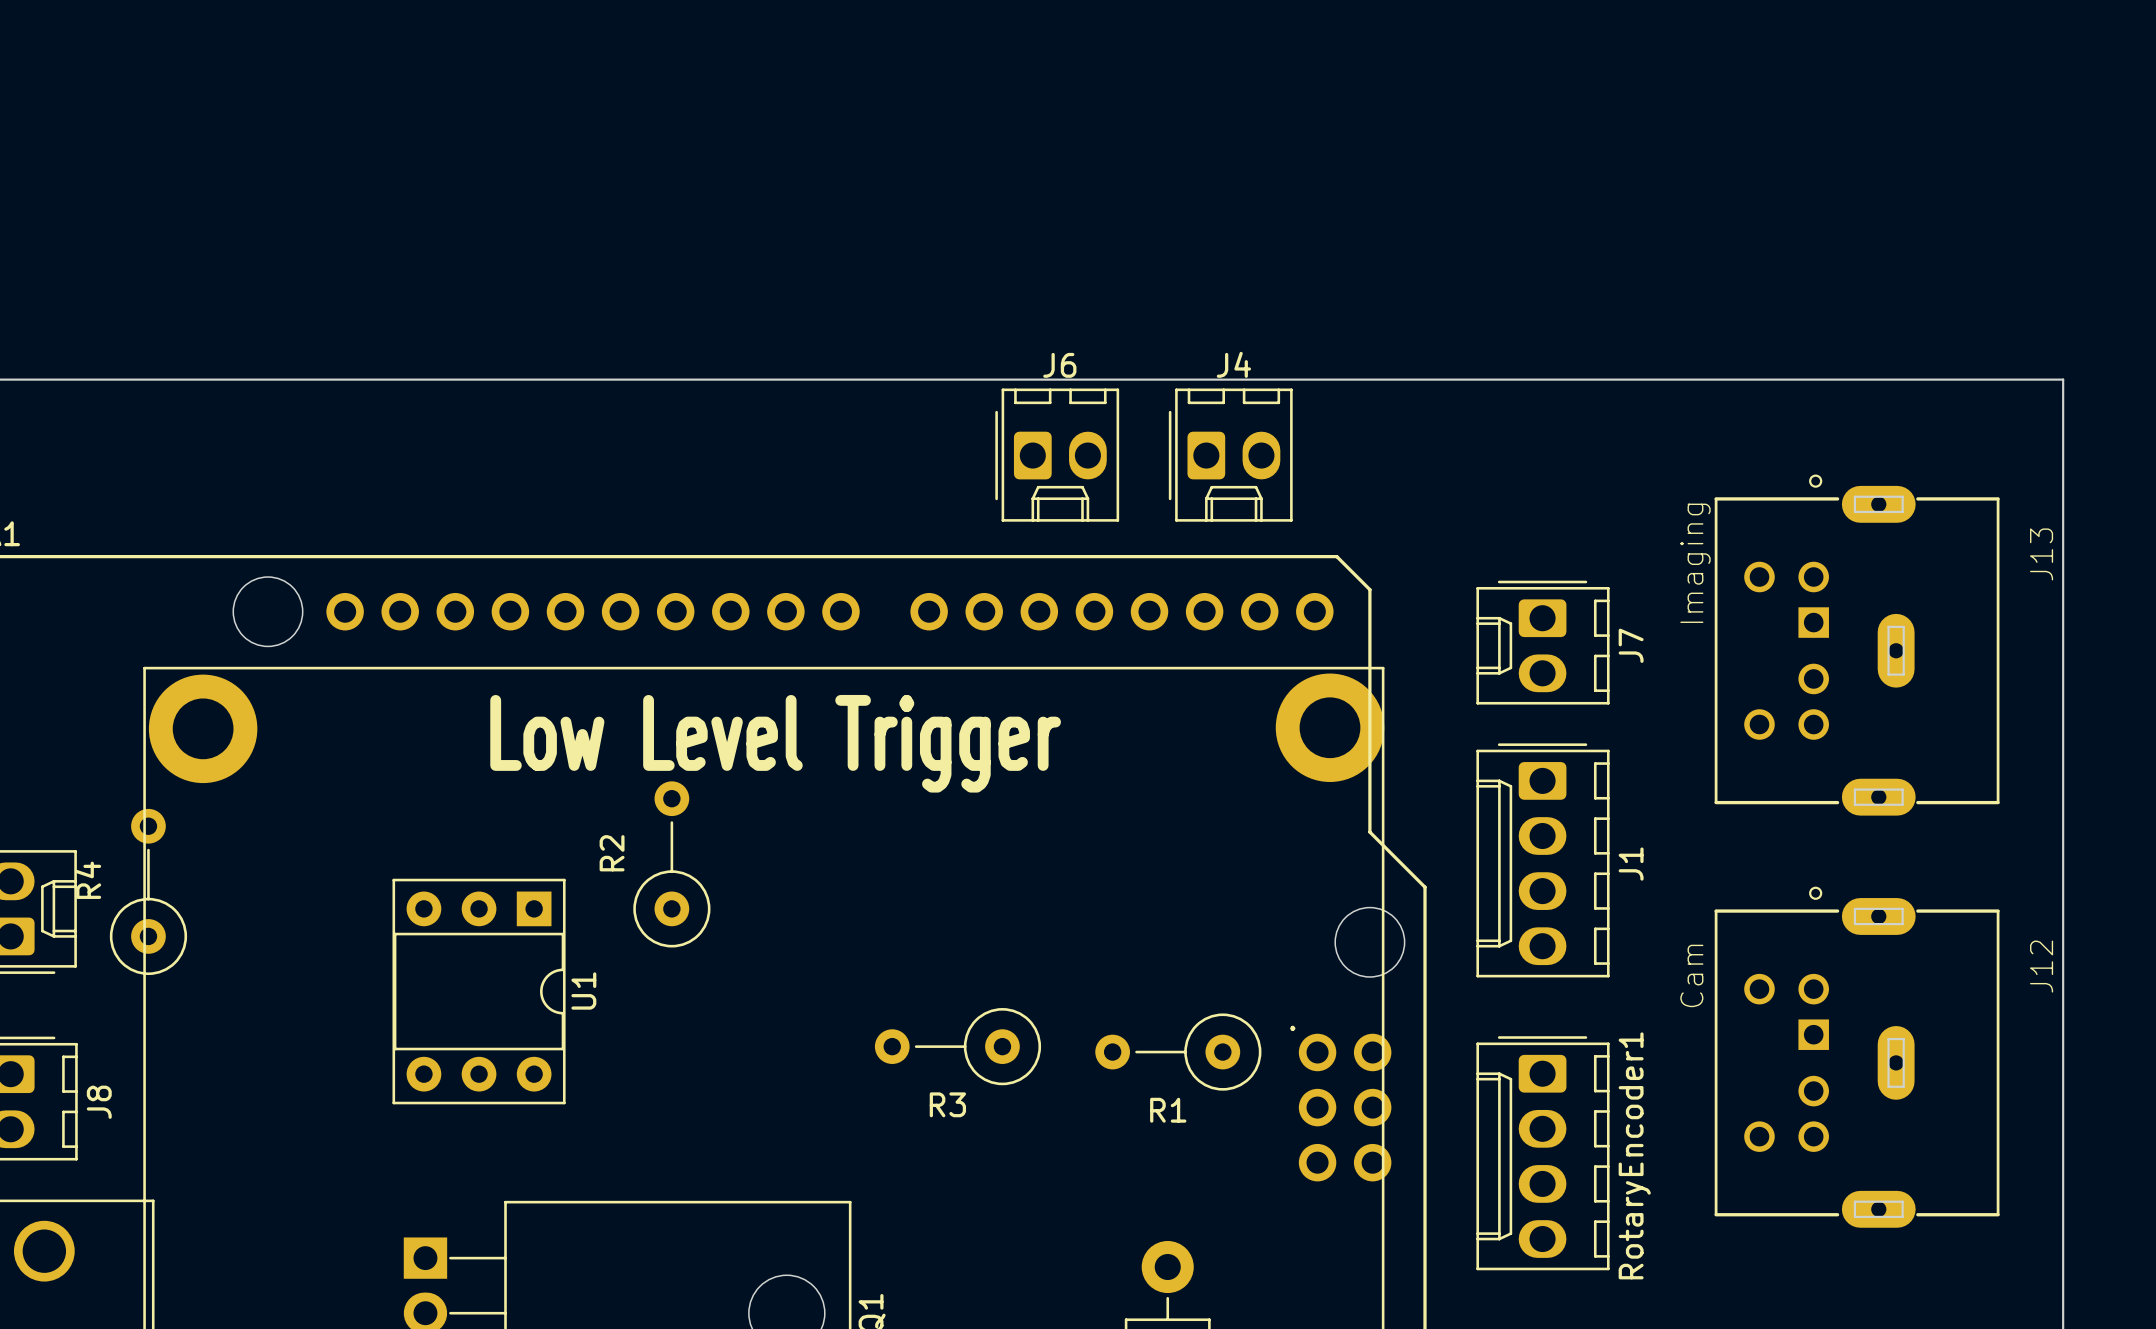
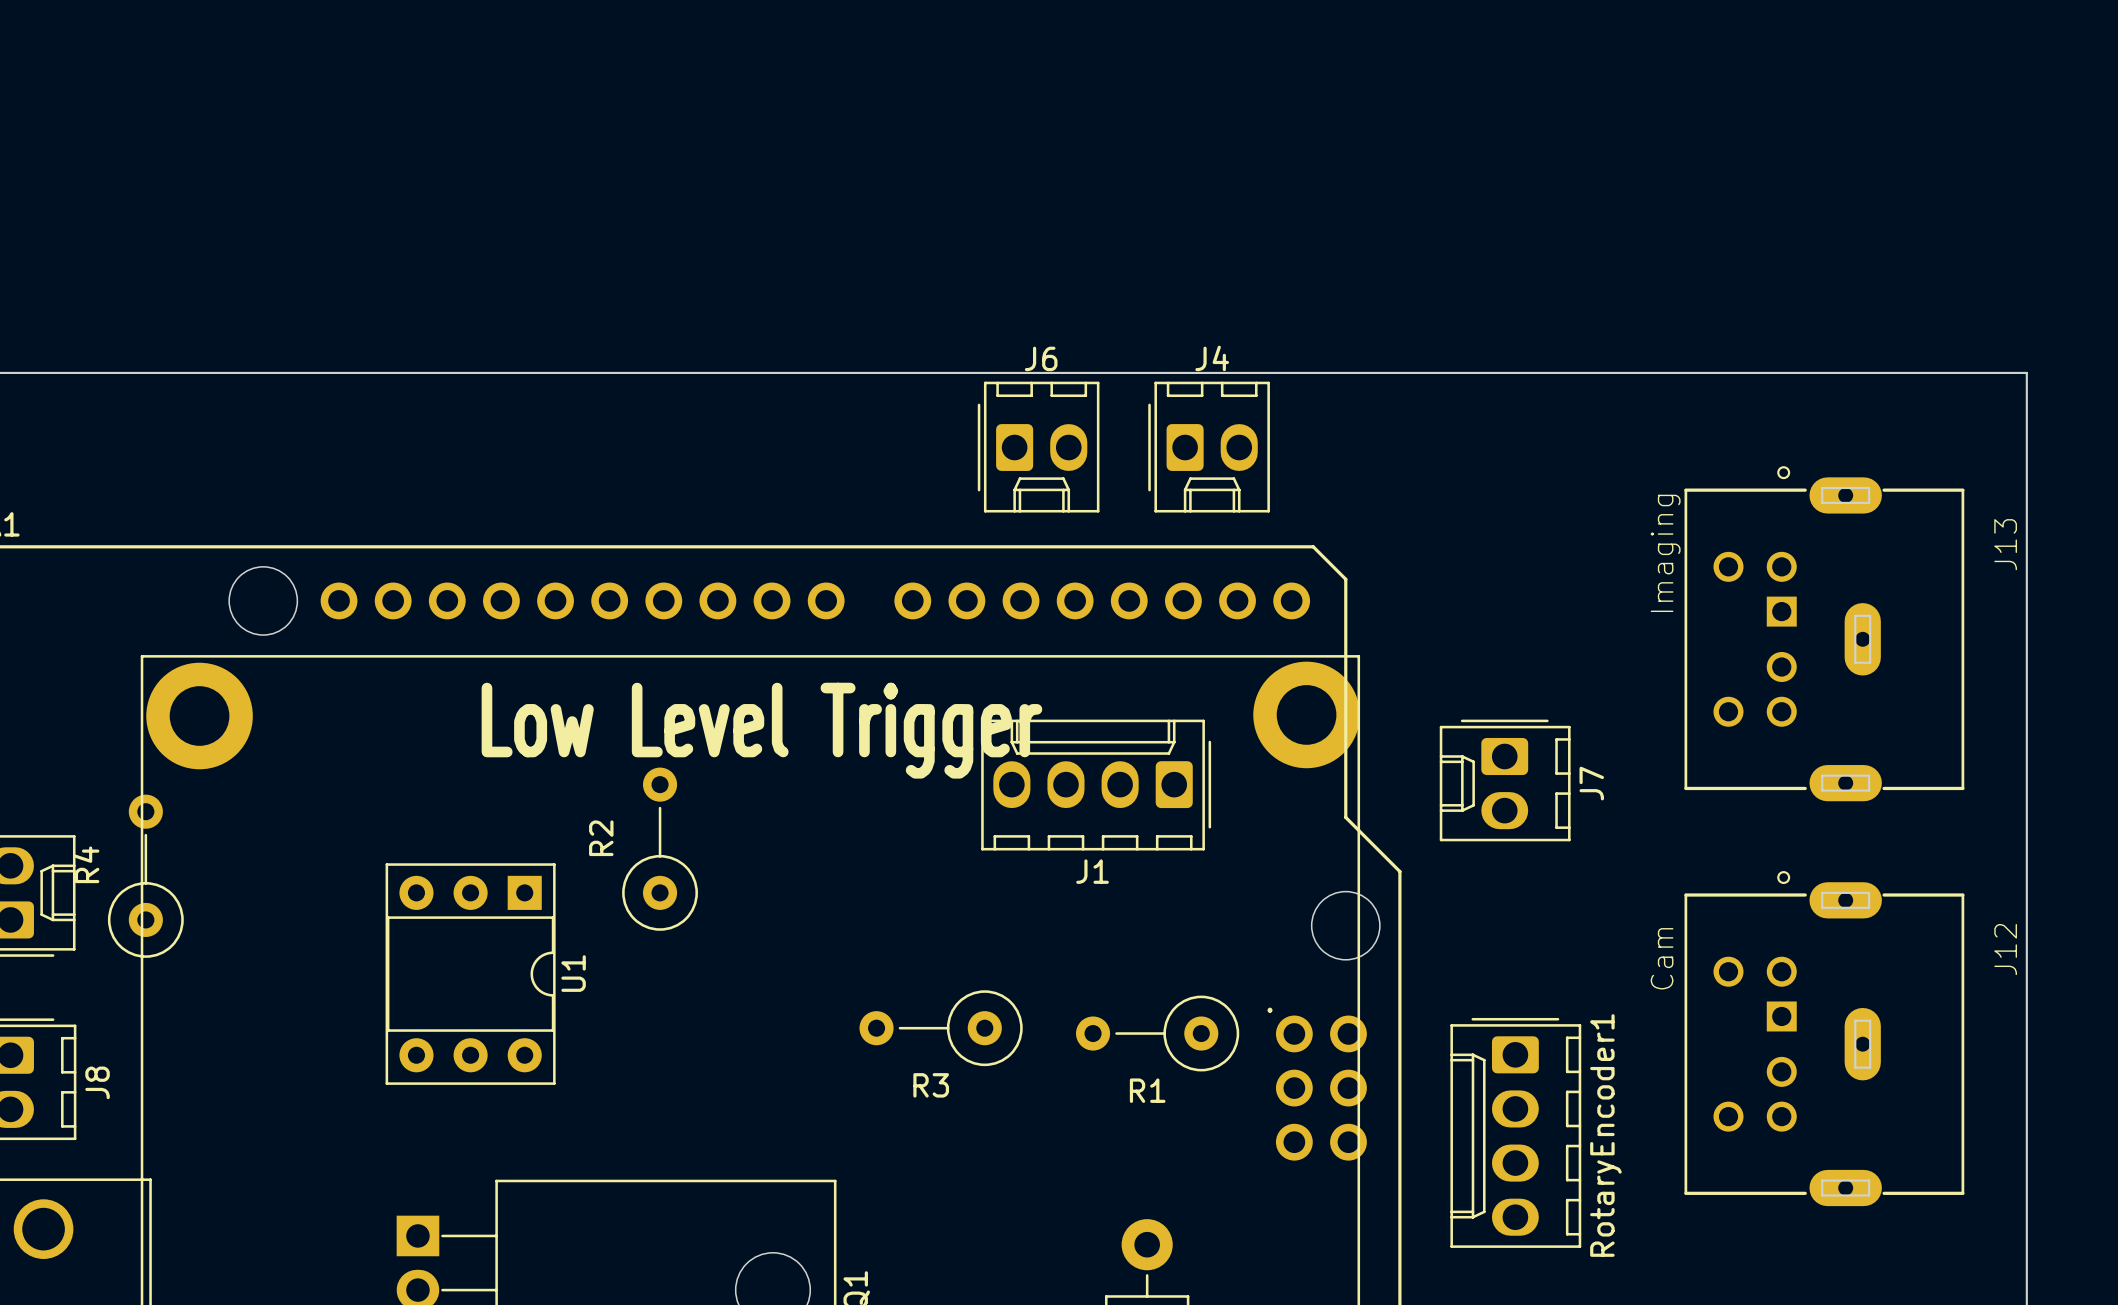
J7 position: (1543, 642) -> (1505, 780)
J1 rotation: 0° (1543, 860) -> 90° clockwise (1096, 785)
J1 position: (1543, 860) -> (1096, 785)

